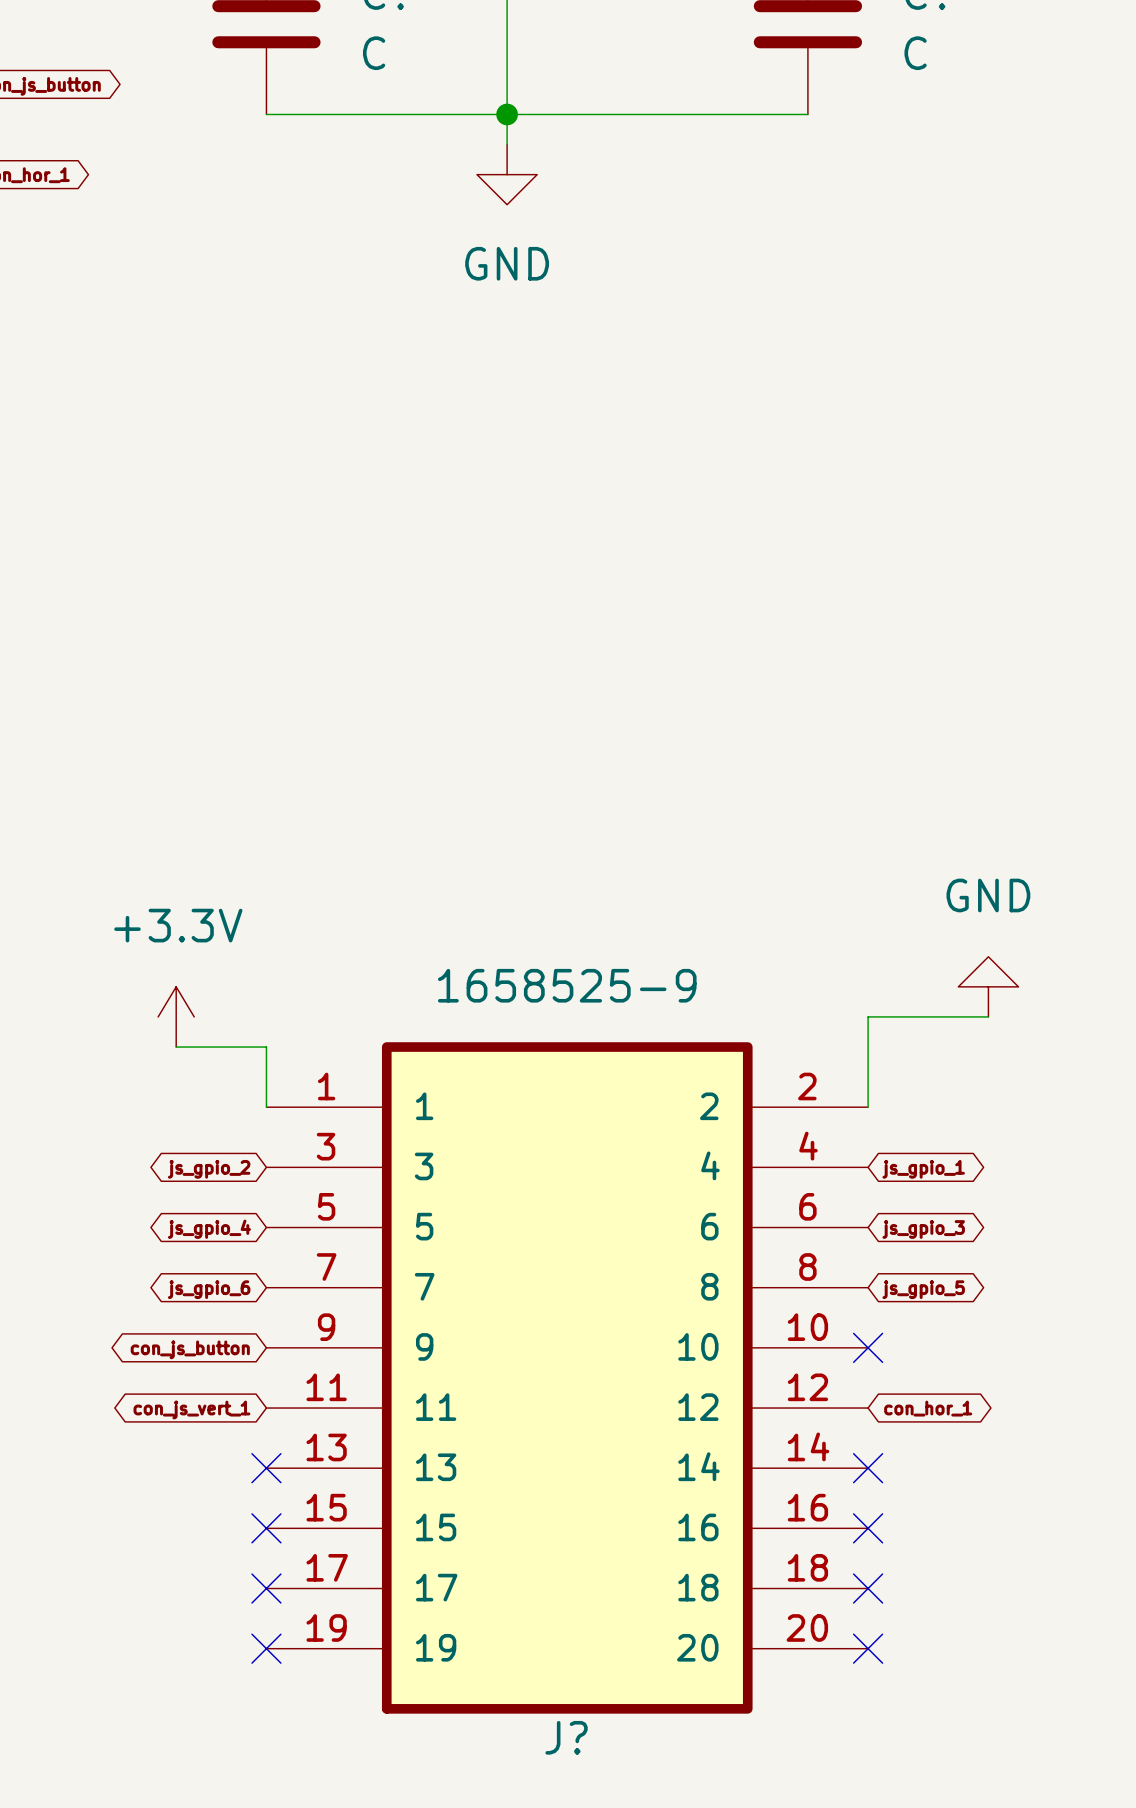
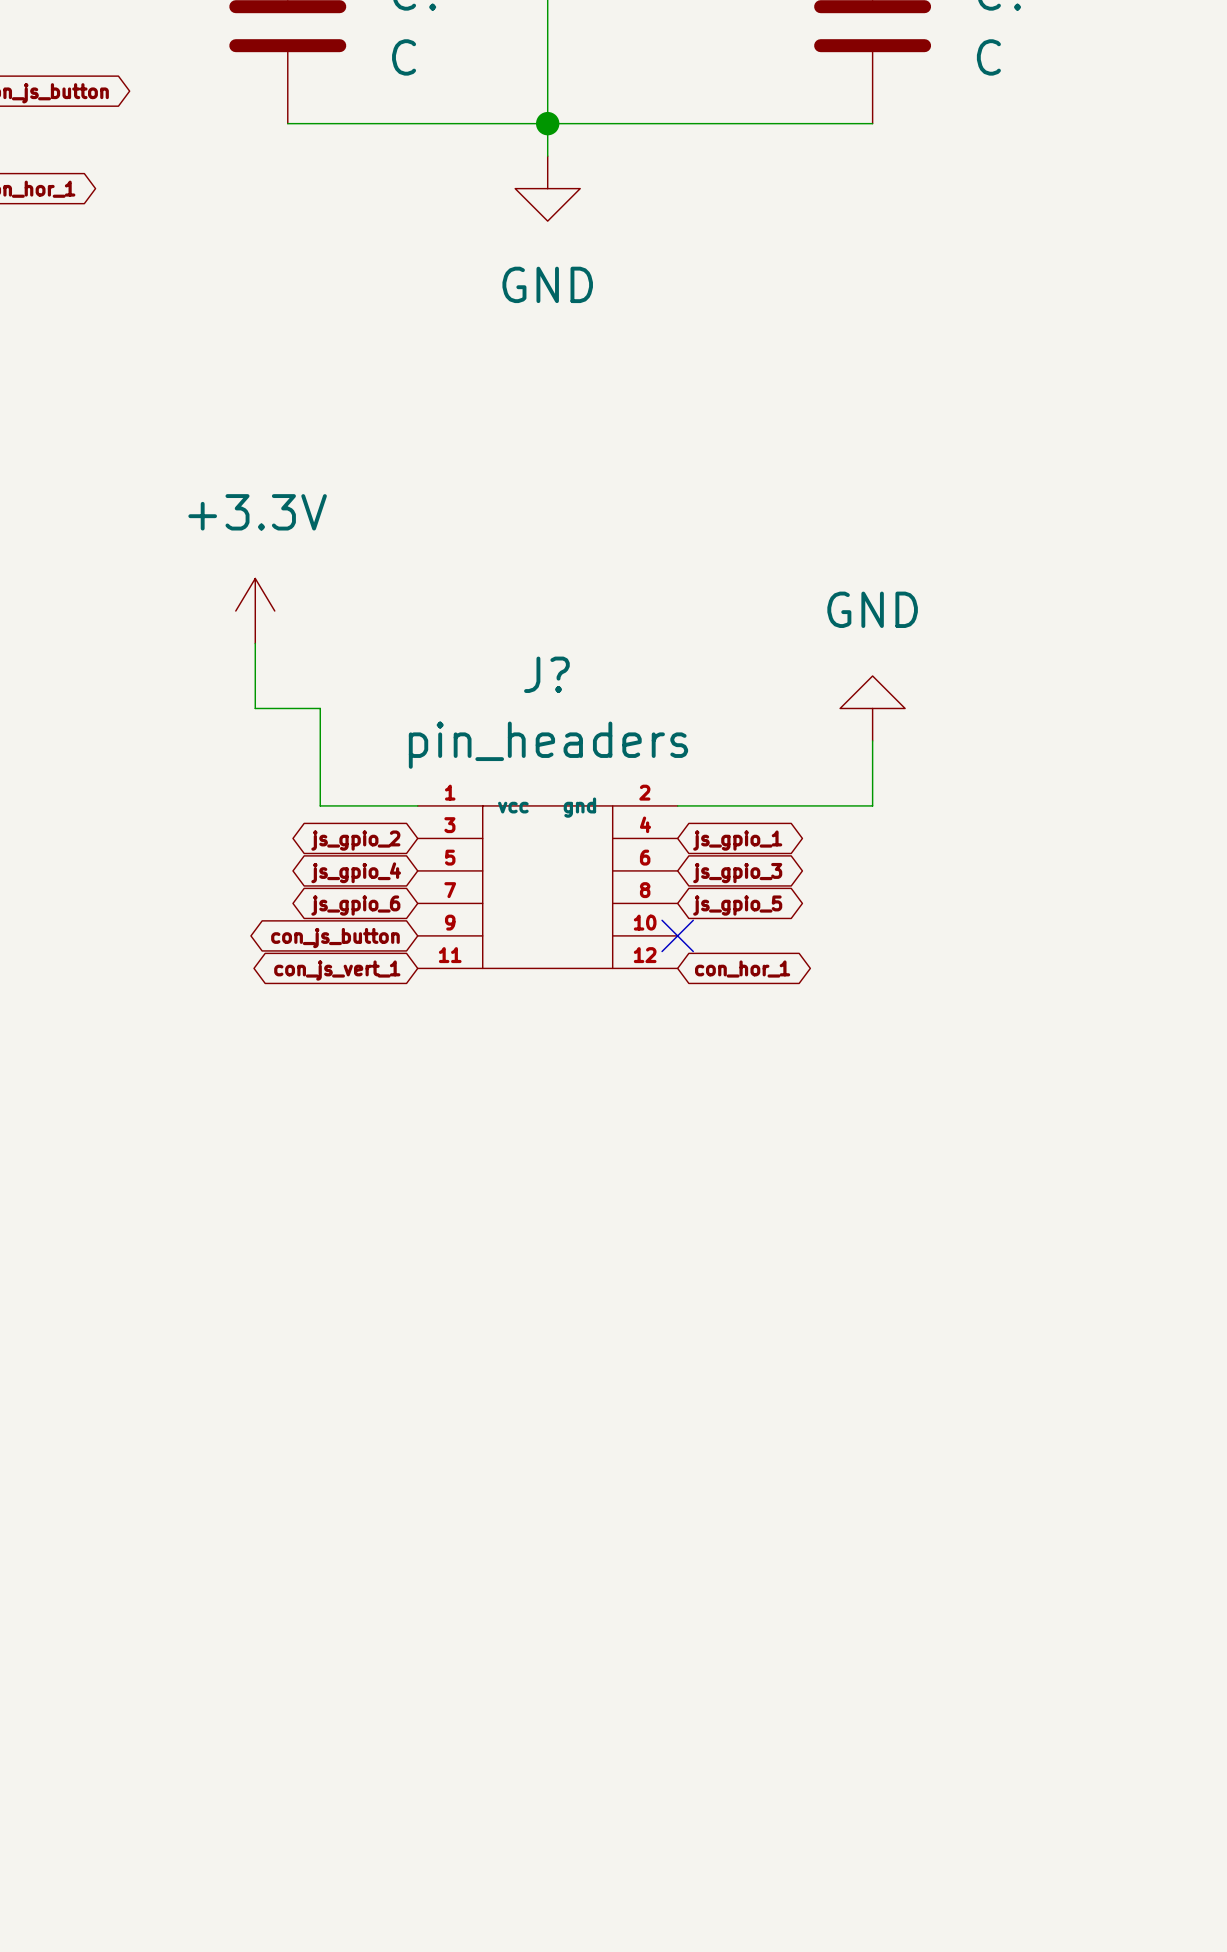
wire: none -> (255, 643) (255, 708) (320, 708) (320, 805) (417, 805)
wire: none -> (872, 740) (872, 805) (677, 805)
J?: none -> pin_headers (547, 887)
no-connect mark: none -> (677, 935)
power symbol position: GND (988, 986) -> GND (872, 708)
power symbol position: +3.3V (176, 1016) -> +3.3V (255, 611)
wire: (988, 1016) (868, 1016) (868, 1107) -> none
wire: (176, 1047) (266, 1047) (266, 1107) -> none
global label position: js_gpio_2 (209, 1169) -> js_gpio_2 (355, 840)
global label position: js_gpio_1 (923, 1169) -> js_gpio_1 (737, 840)
global label position: js_gpio_4 (209, 1229) -> js_gpio_4 (356, 872)
global label position: js_gpio_3 (923, 1229) -> js_gpio_3 (737, 873)
global label position: js_gpio_6 (209, 1289) -> js_gpio_6 (355, 905)
global label position: js_gpio_5 (923, 1289) -> js_gpio_5 (737, 905)
no-connect mark: (868, 1347) -> none
global label position: con_js_button (190, 1349) -> con_js_button (335, 938)
J?: 1658525-9 (567, 1377) -> none
global label position: con_hor_1 (928, 1408) -> con_hor_1 (742, 969)
global label position: con_js_vert_1 (191, 1409) -> con_js_vert_1 (337, 970)
no-connect mark: (266, 1468) -> none
no-connect mark: (868, 1468) -> none
no-connect mark: (266, 1528) -> none
no-connect mark: (868, 1528) -> none
no-connect mark: (266, 1588) -> none
no-connect mark: (868, 1588) -> none
no-connect mark: (266, 1648) -> none
no-connect mark: (868, 1648) -> none

